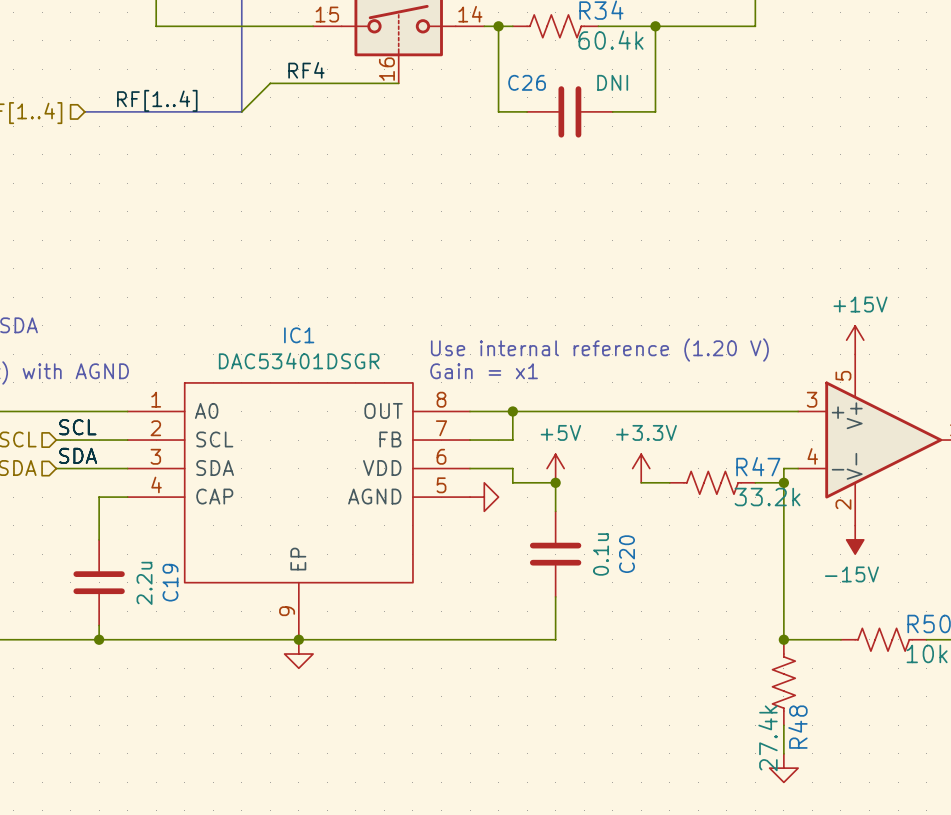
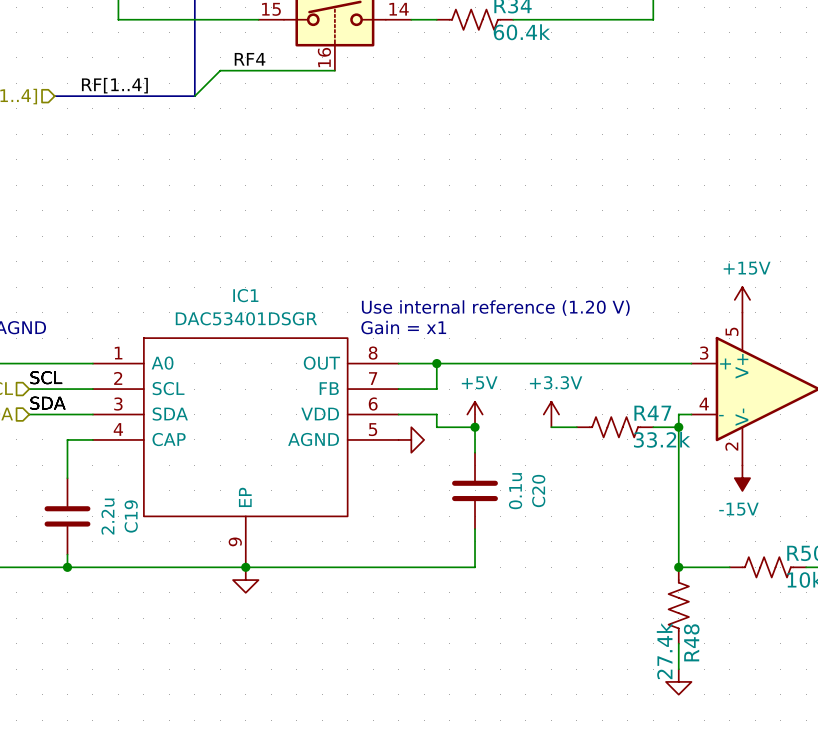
wire: (498, 26) (498, 111) (527, 111) -> none
junction: (498, 26) -> none
wire: (655, 26) (655, 111) (612, 111) -> none
junction: (655, 26) -> none
C26: DNI (569, 111) -> none

